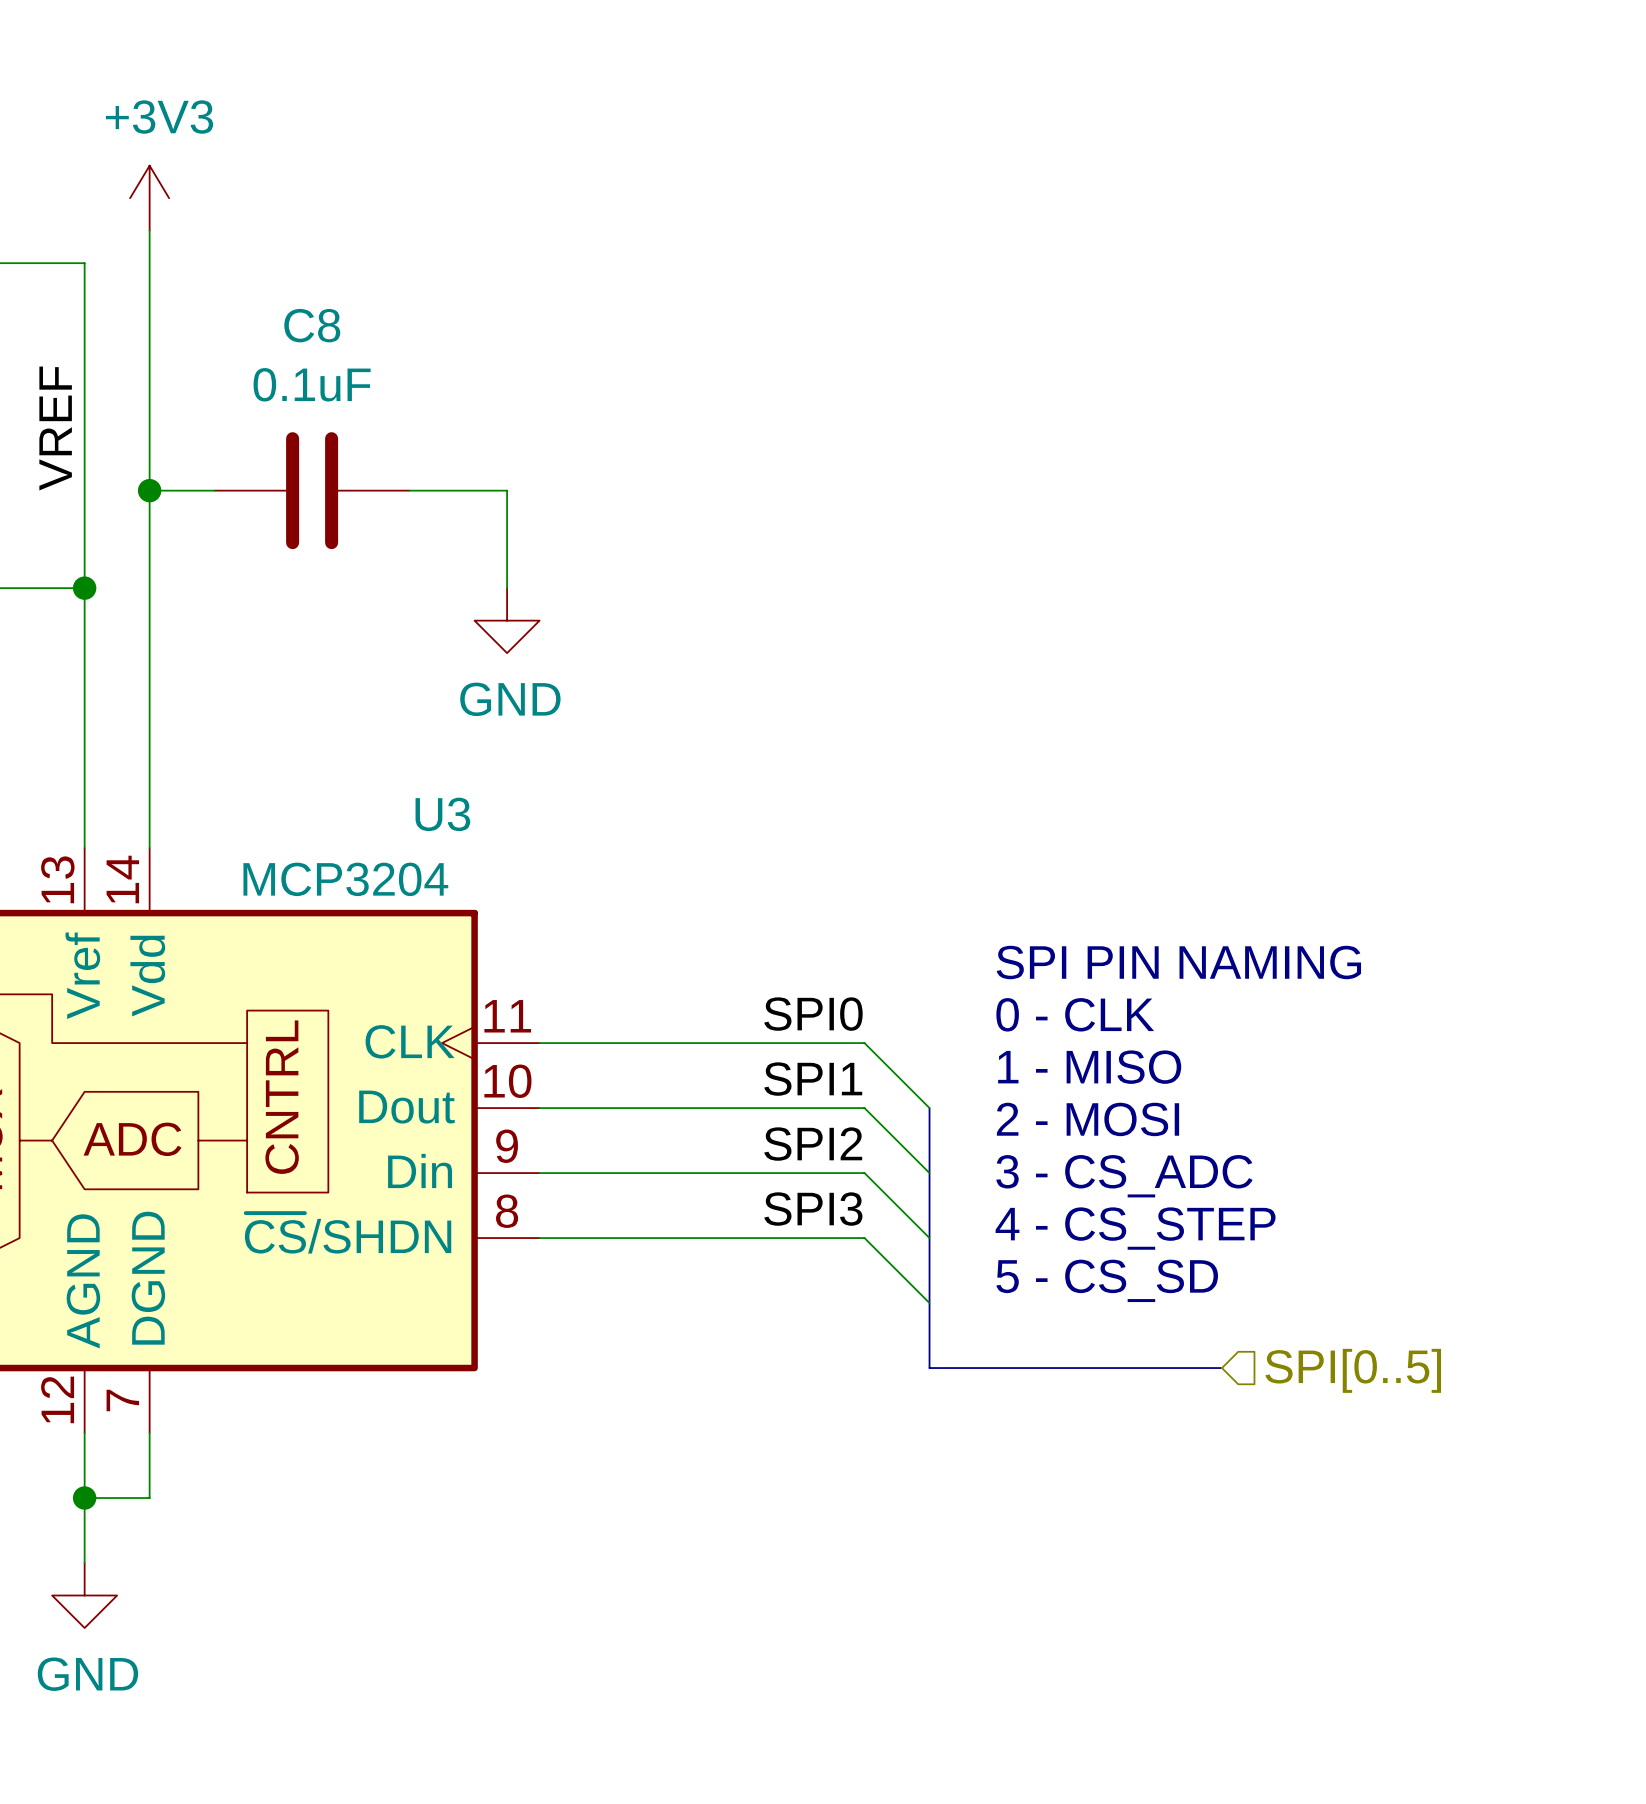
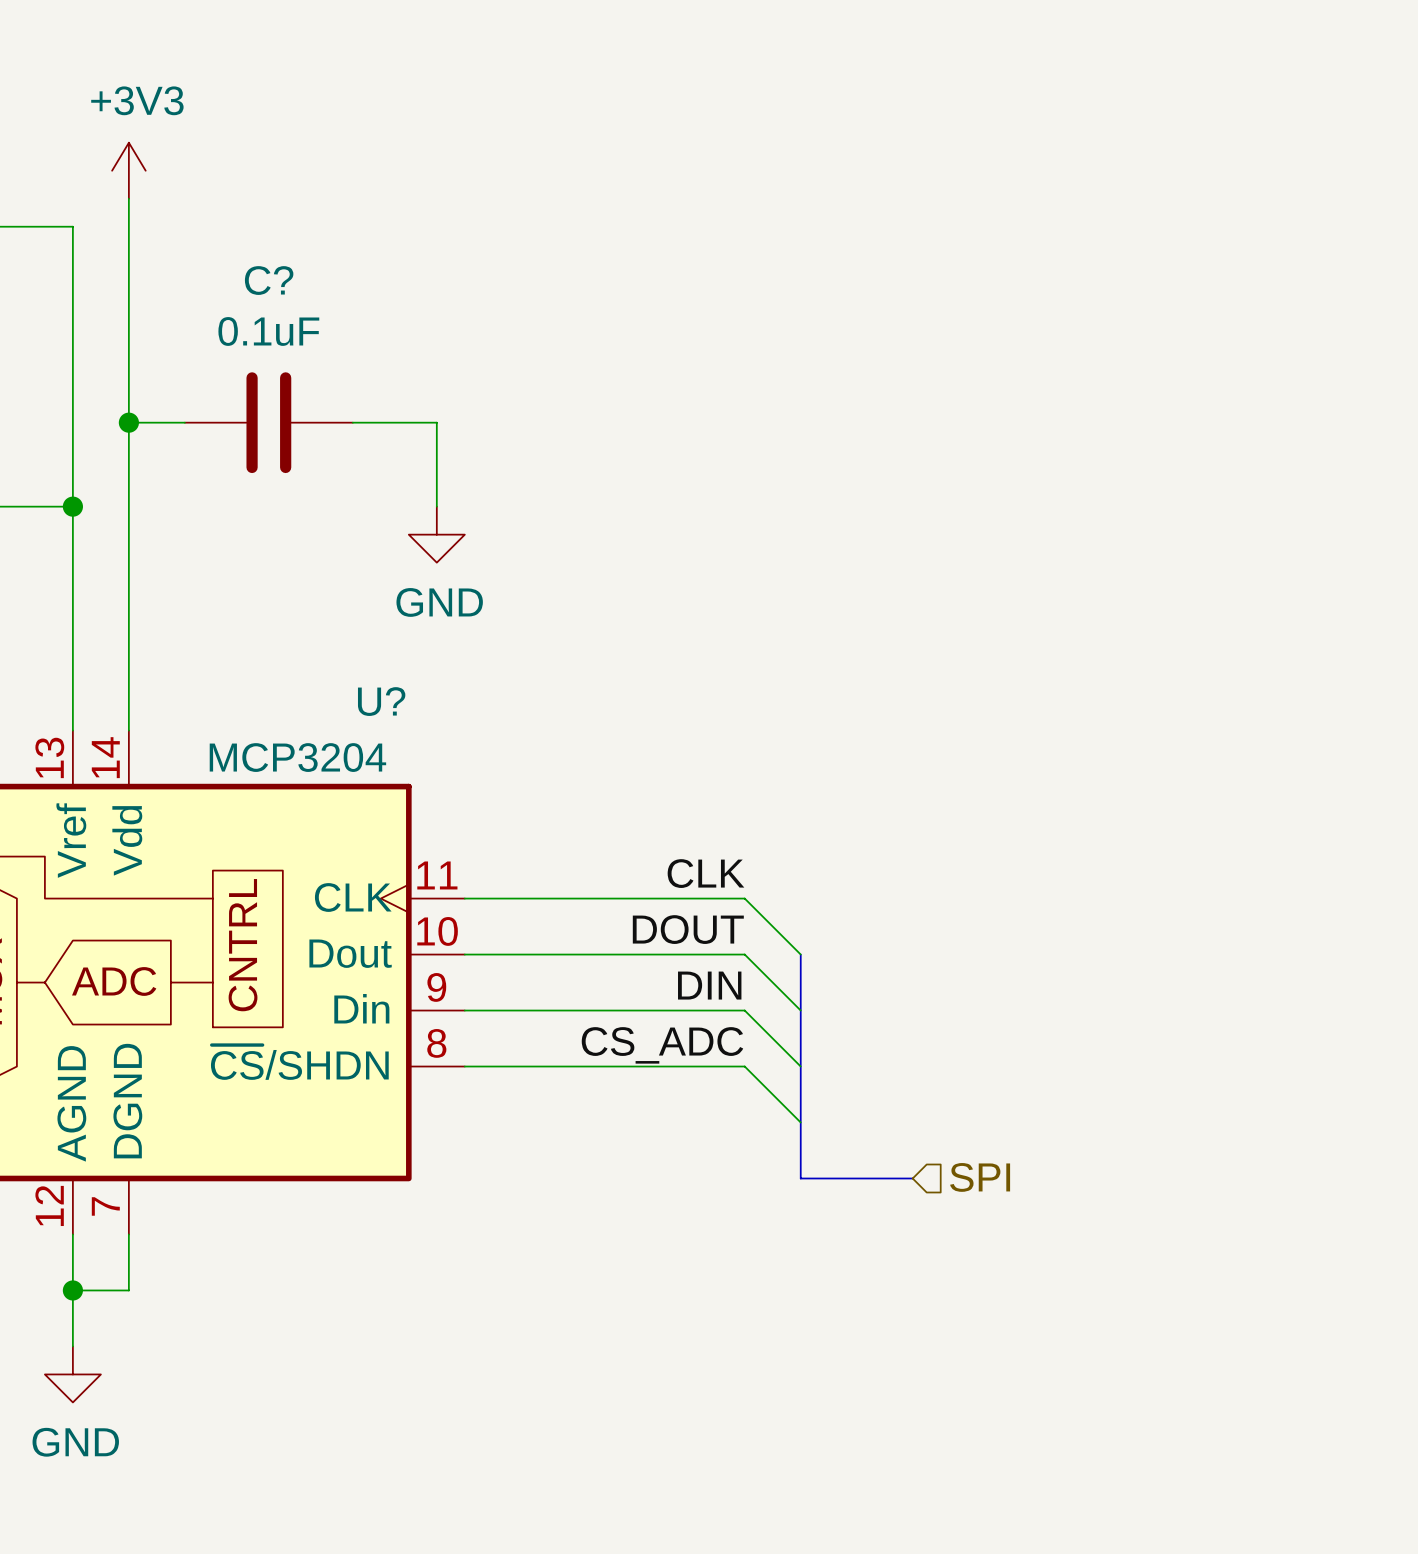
C8 name: C8 (312, 325) -> C? (269, 280)
label: VREF (55, 428) -> none
U3 name: U3 (442, 814) -> U? (381, 701)
text: SPI PIN NAMING (1178, 962) -> none
label: SPI0 (813, 1014) -> CLK (705, 873)
text: 0 - CLK (1075, 1014) -> none
text: 1 - MISO (1089, 1067) -> none
label: SPI1 (813, 1079) -> DOUT (688, 929)
text: 2 - MOSI (1088, 1119) -> none
label: SPI2 (813, 1144) -> DIN (709, 985)
text: 3 - CS_ADC (1124, 1176) -> none
label: SPI3 (813, 1209) -> CS_ADC (662, 1045)
text: 4 - CS_STEP (1135, 1228) -> none
text: 5 - CS_SD (1107, 1280) -> none
hierarchical label: none -> SPI (980, 1177)
bus: (1059, 1368) (1221, 1368) -> none
hierarchical label: SPI[0..5] (1353, 1370) -> none

